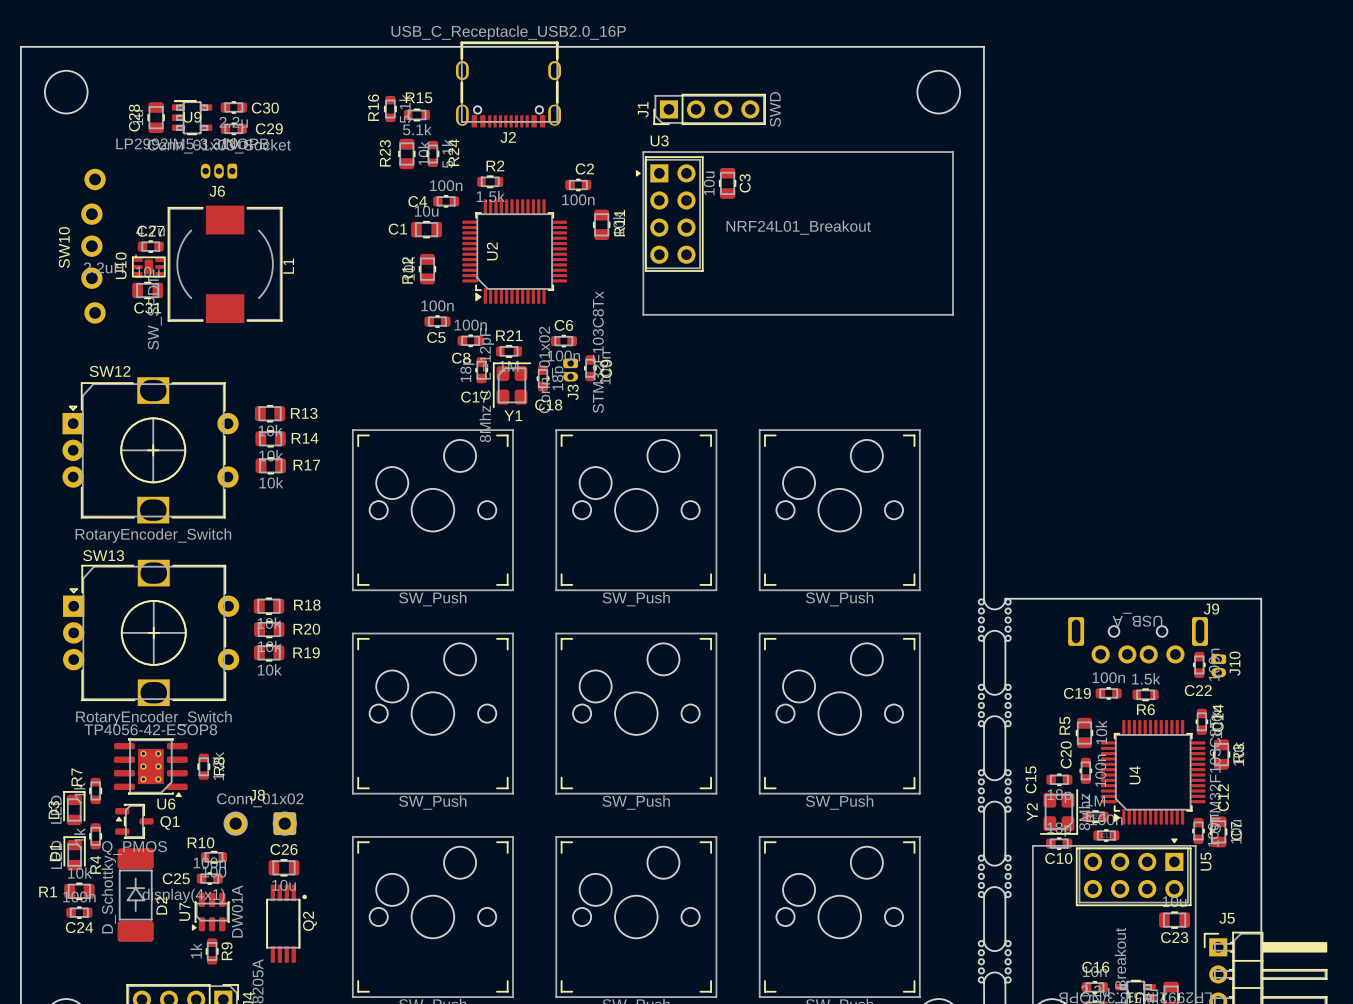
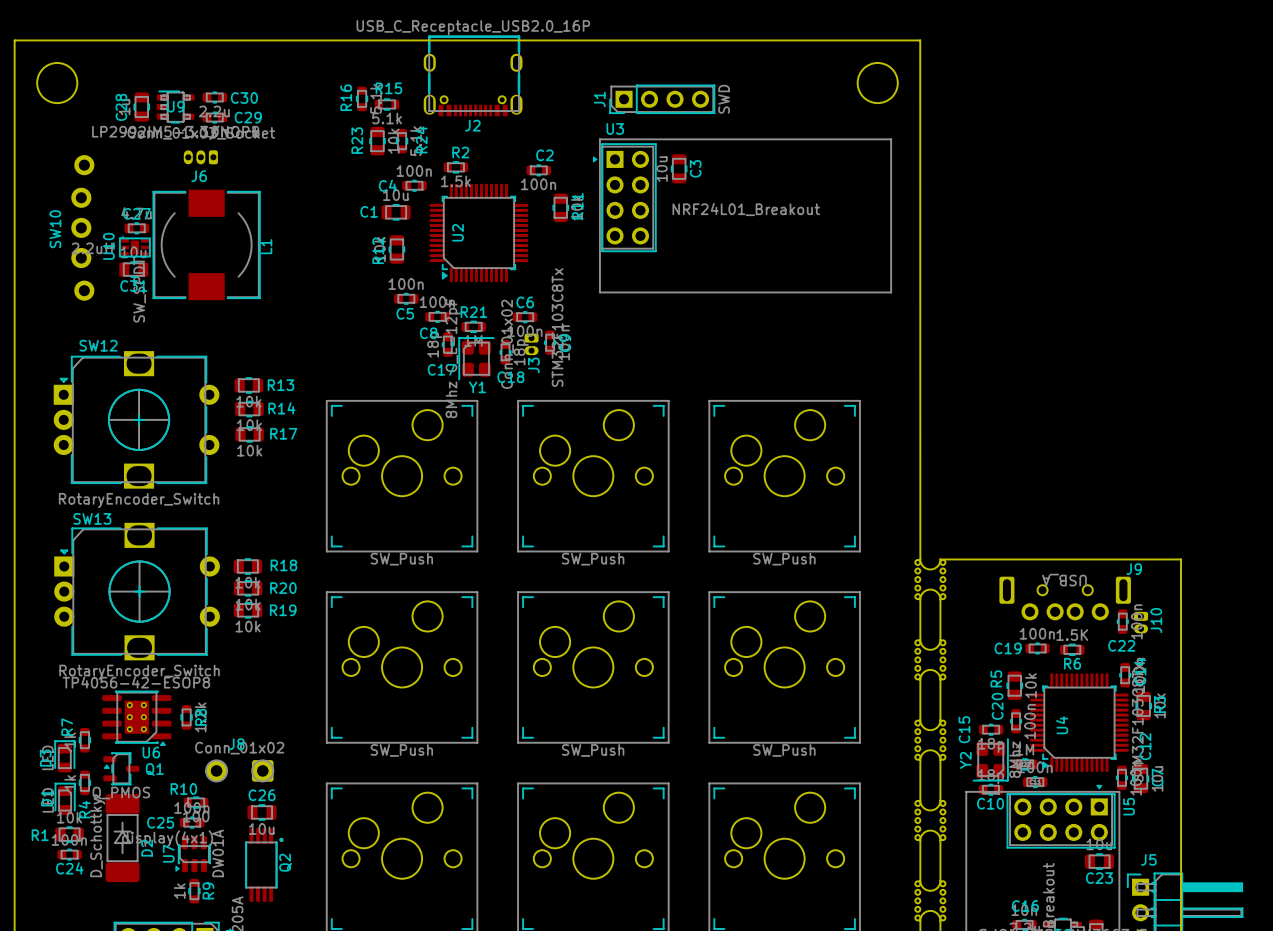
R6 value: 1.5k (1146, 678) -> 1.5K (1072, 635)

